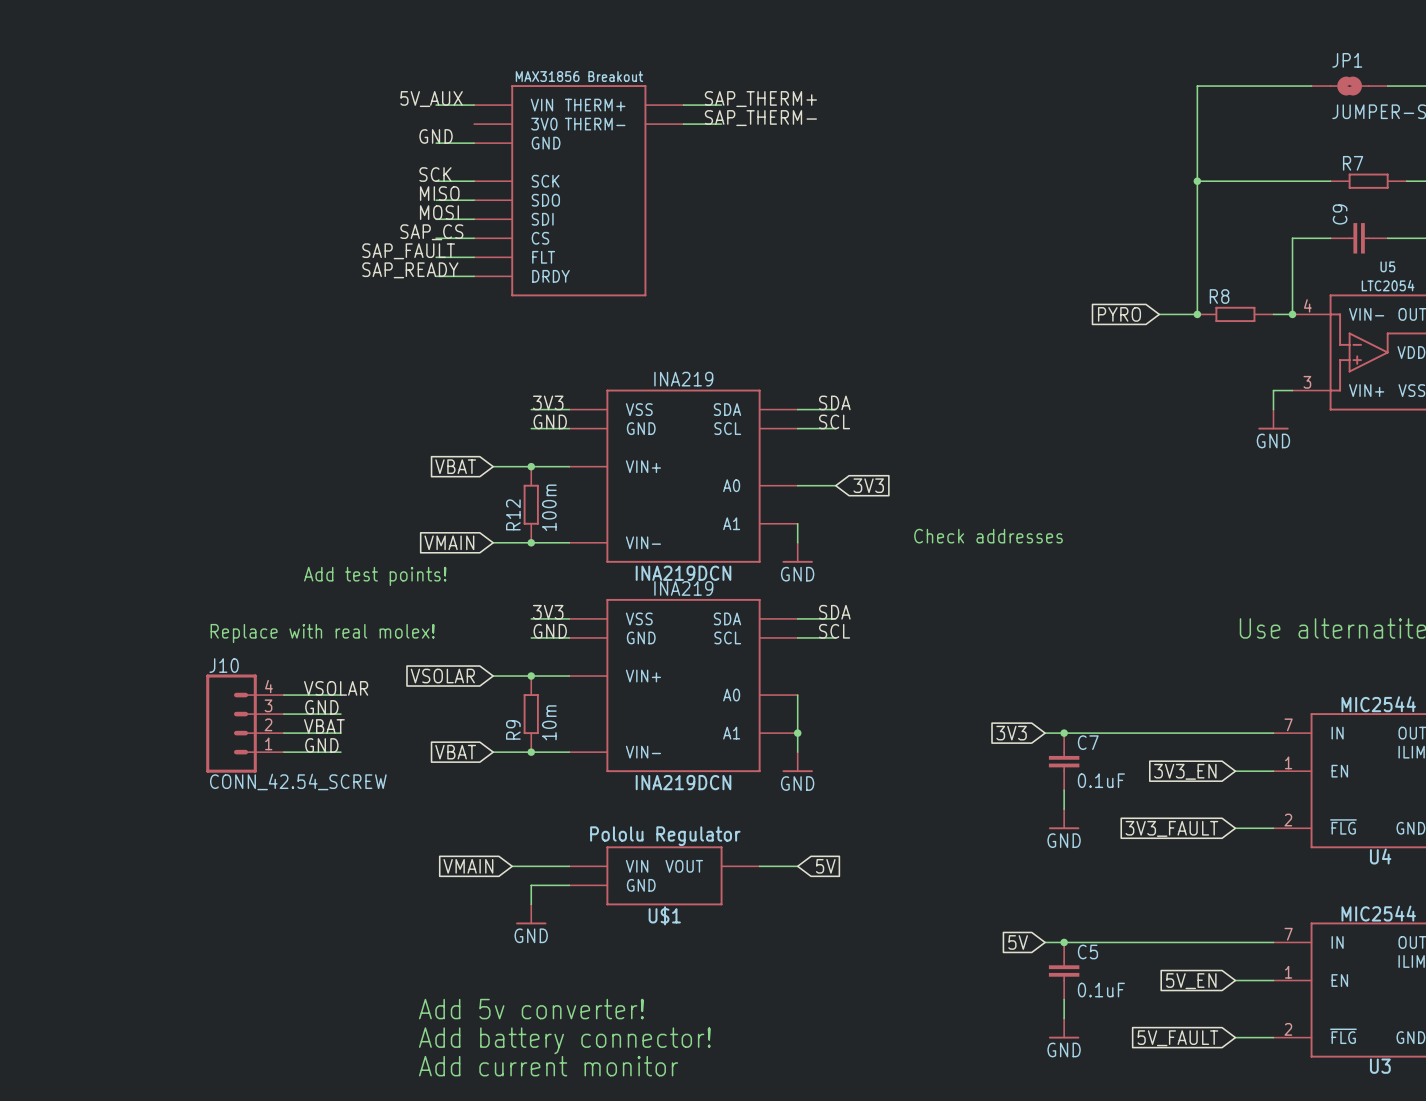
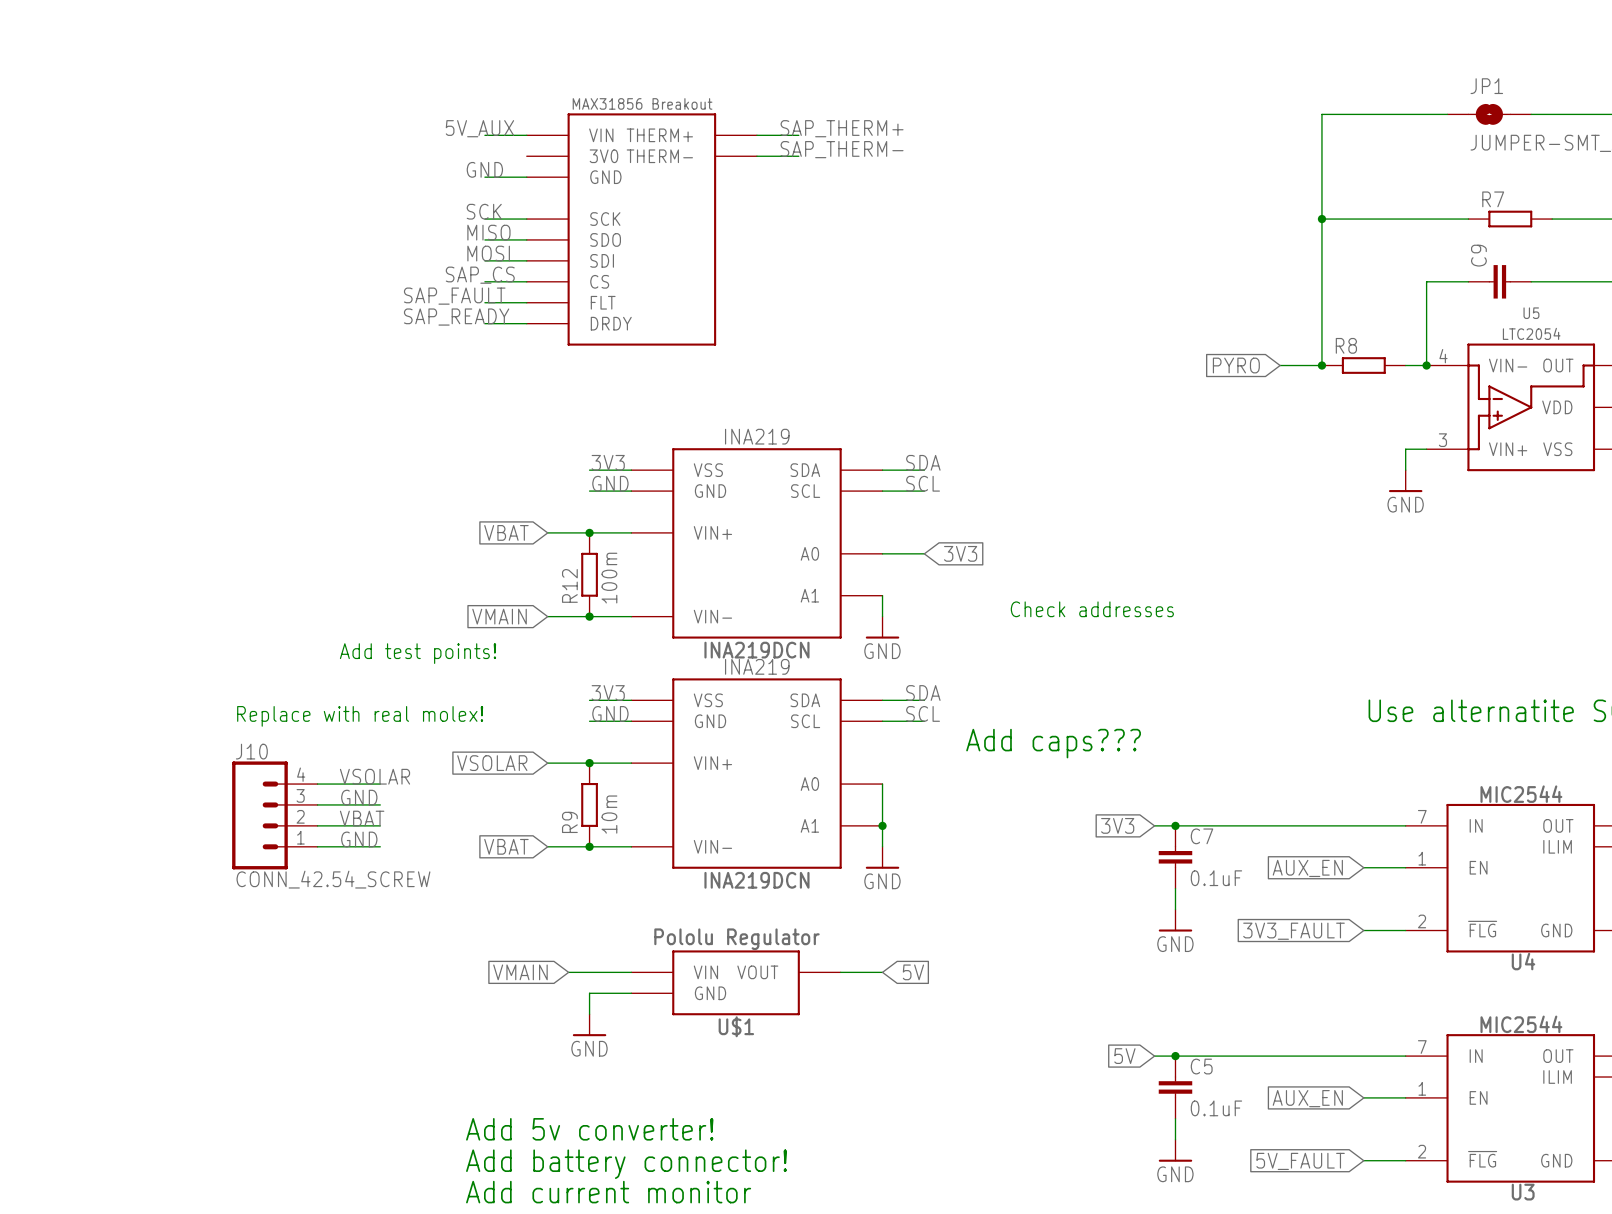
text: none -> Add caps??? (1053, 743)
global label: 3V3_EN (1185, 771) -> AUX_EN (1307, 868)
global label: 5V_EN (1191, 981) -> AUX_EN (1307, 1098)

